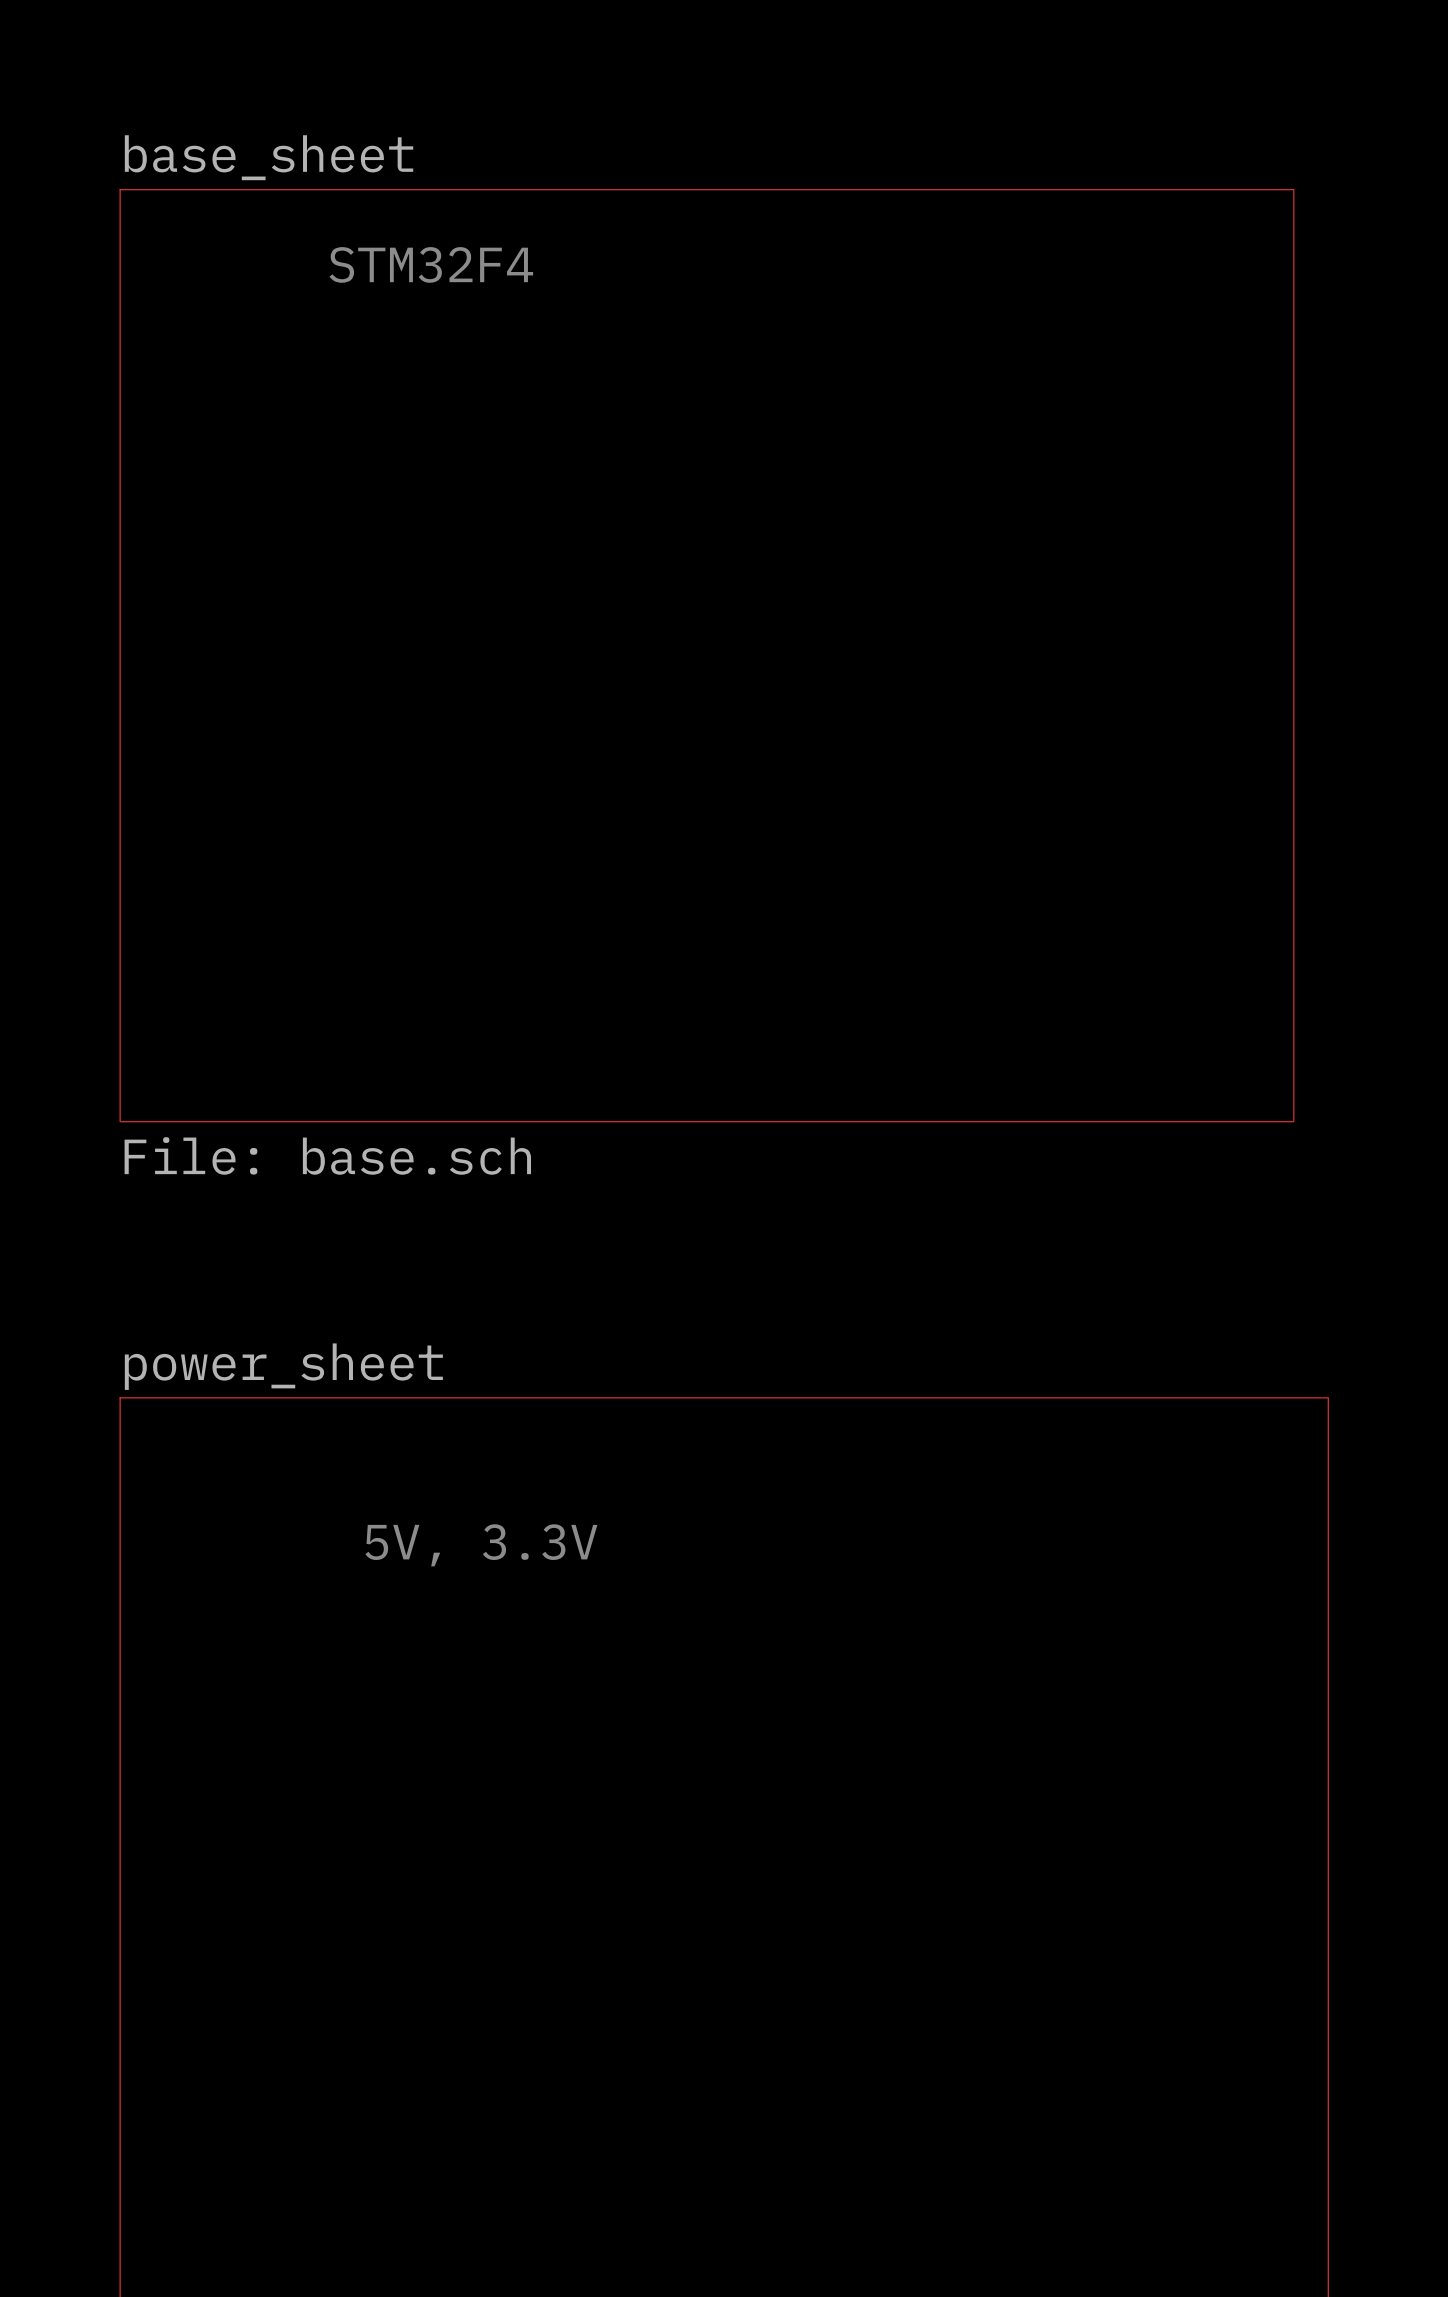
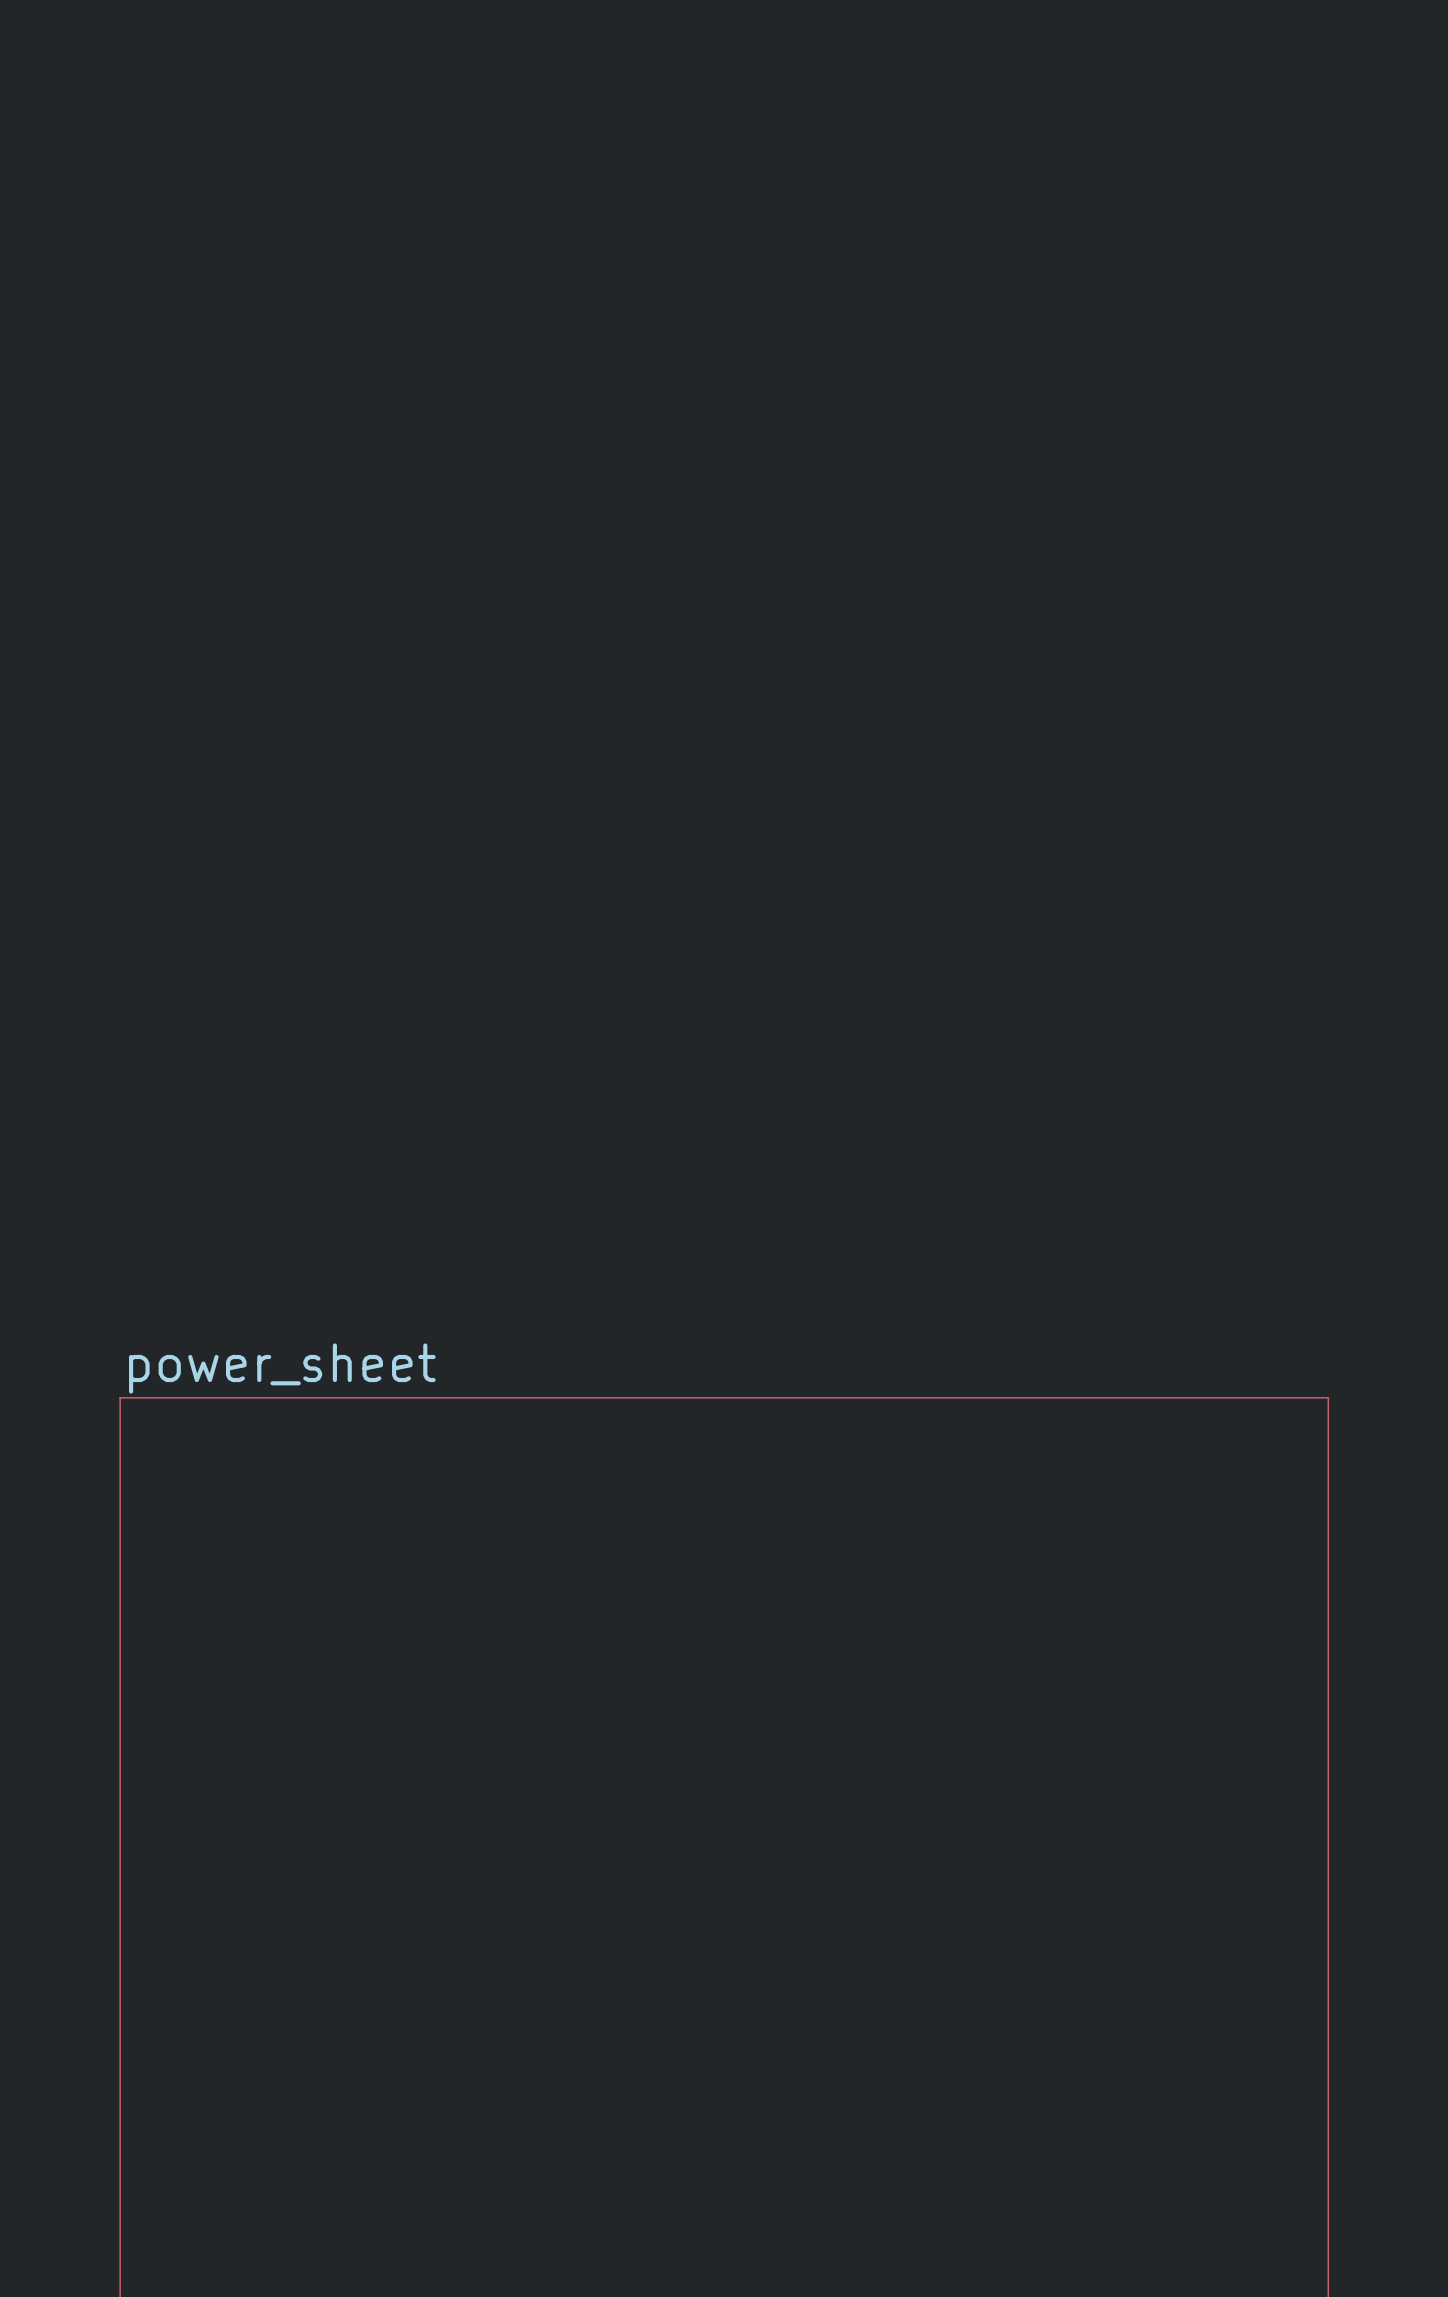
text: STM32F4 (431, 264) -> none
sheet base_sheet: File: base.sch (706, 655) -> none
text: 5V, 3.3V (481, 1545) -> none

